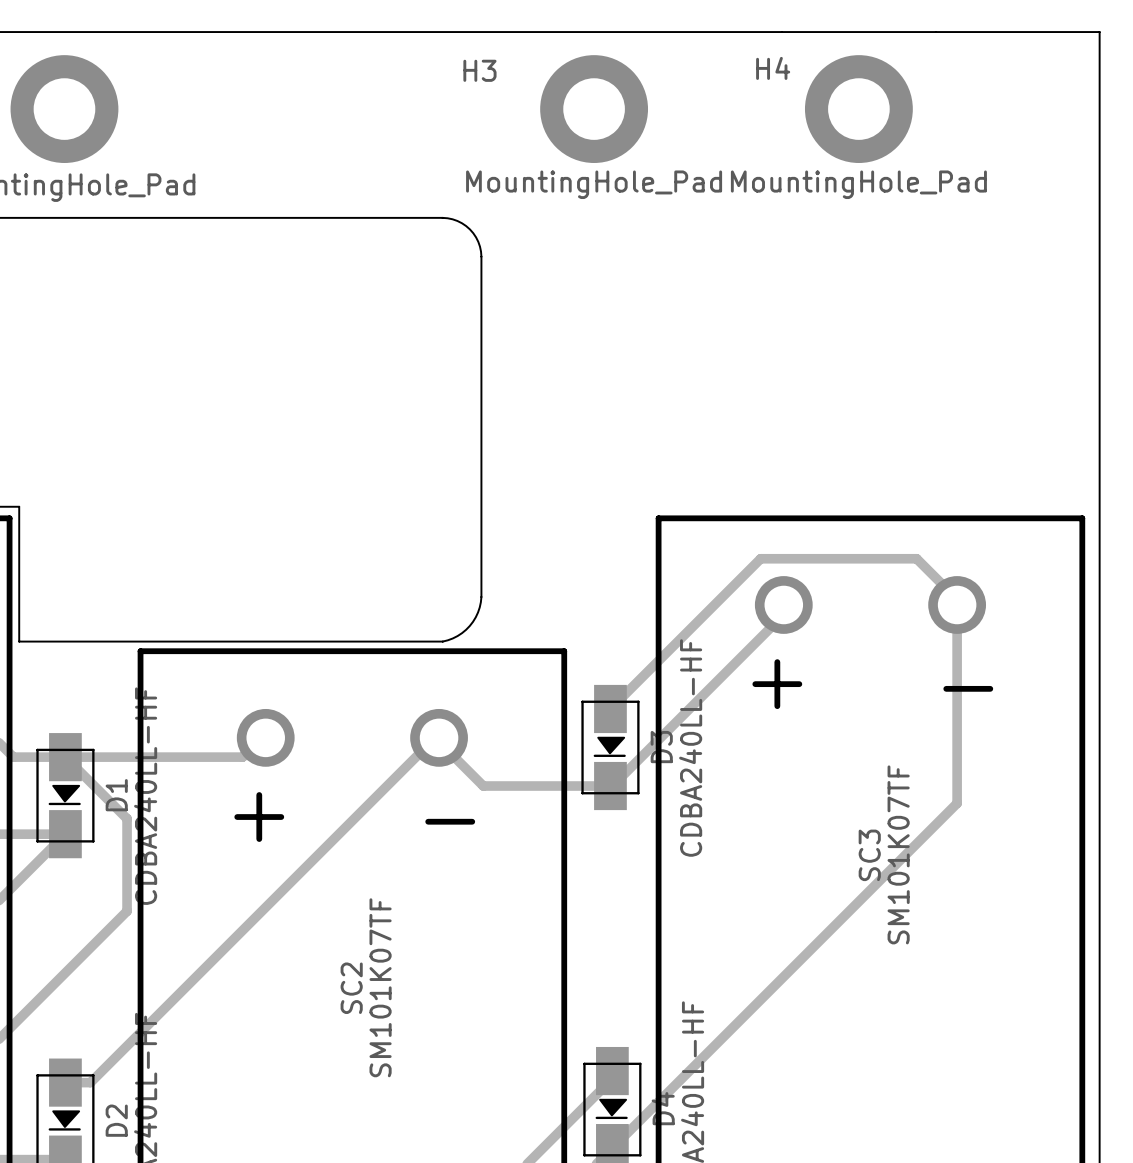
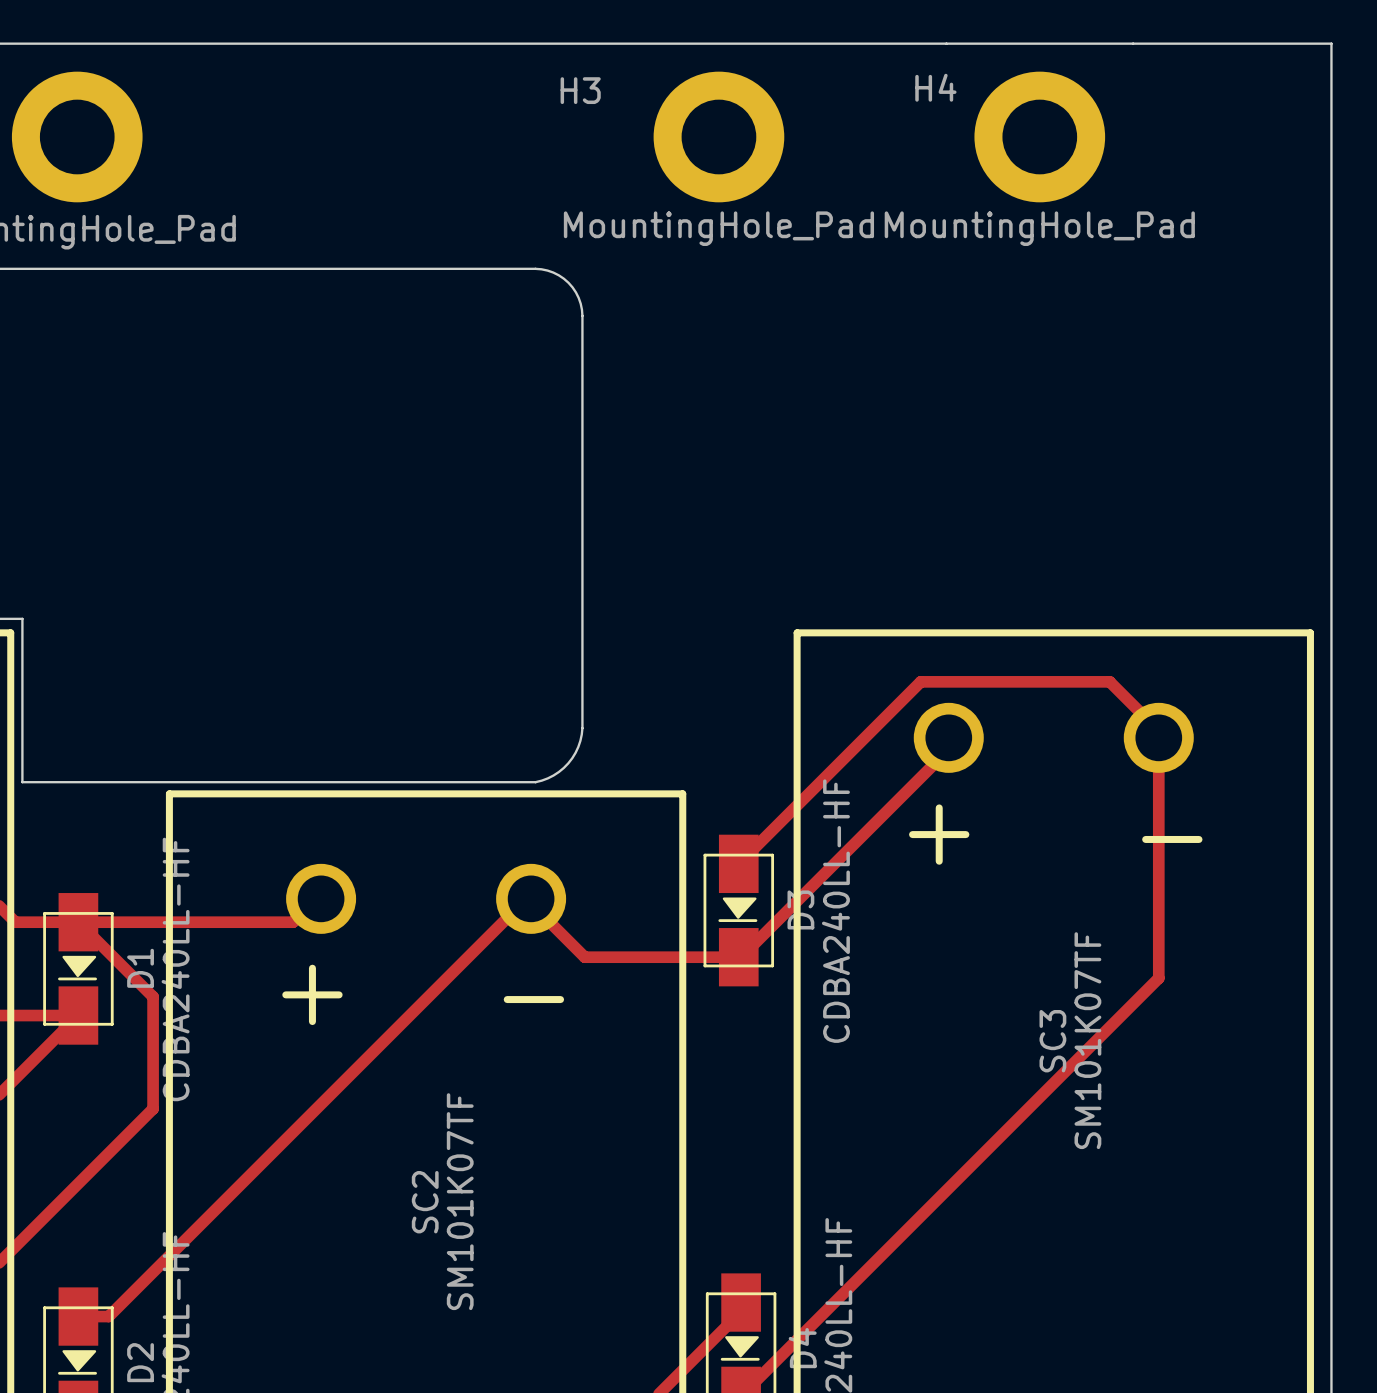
text: none -> + (939, 834)
SC3 text: + (777, 684) -> none
text: none -> + (312, 994)
SC2 text: + (259, 817) -> none
text: none -> - (533, 999)
SC2 text: - (450, 821) -> none

